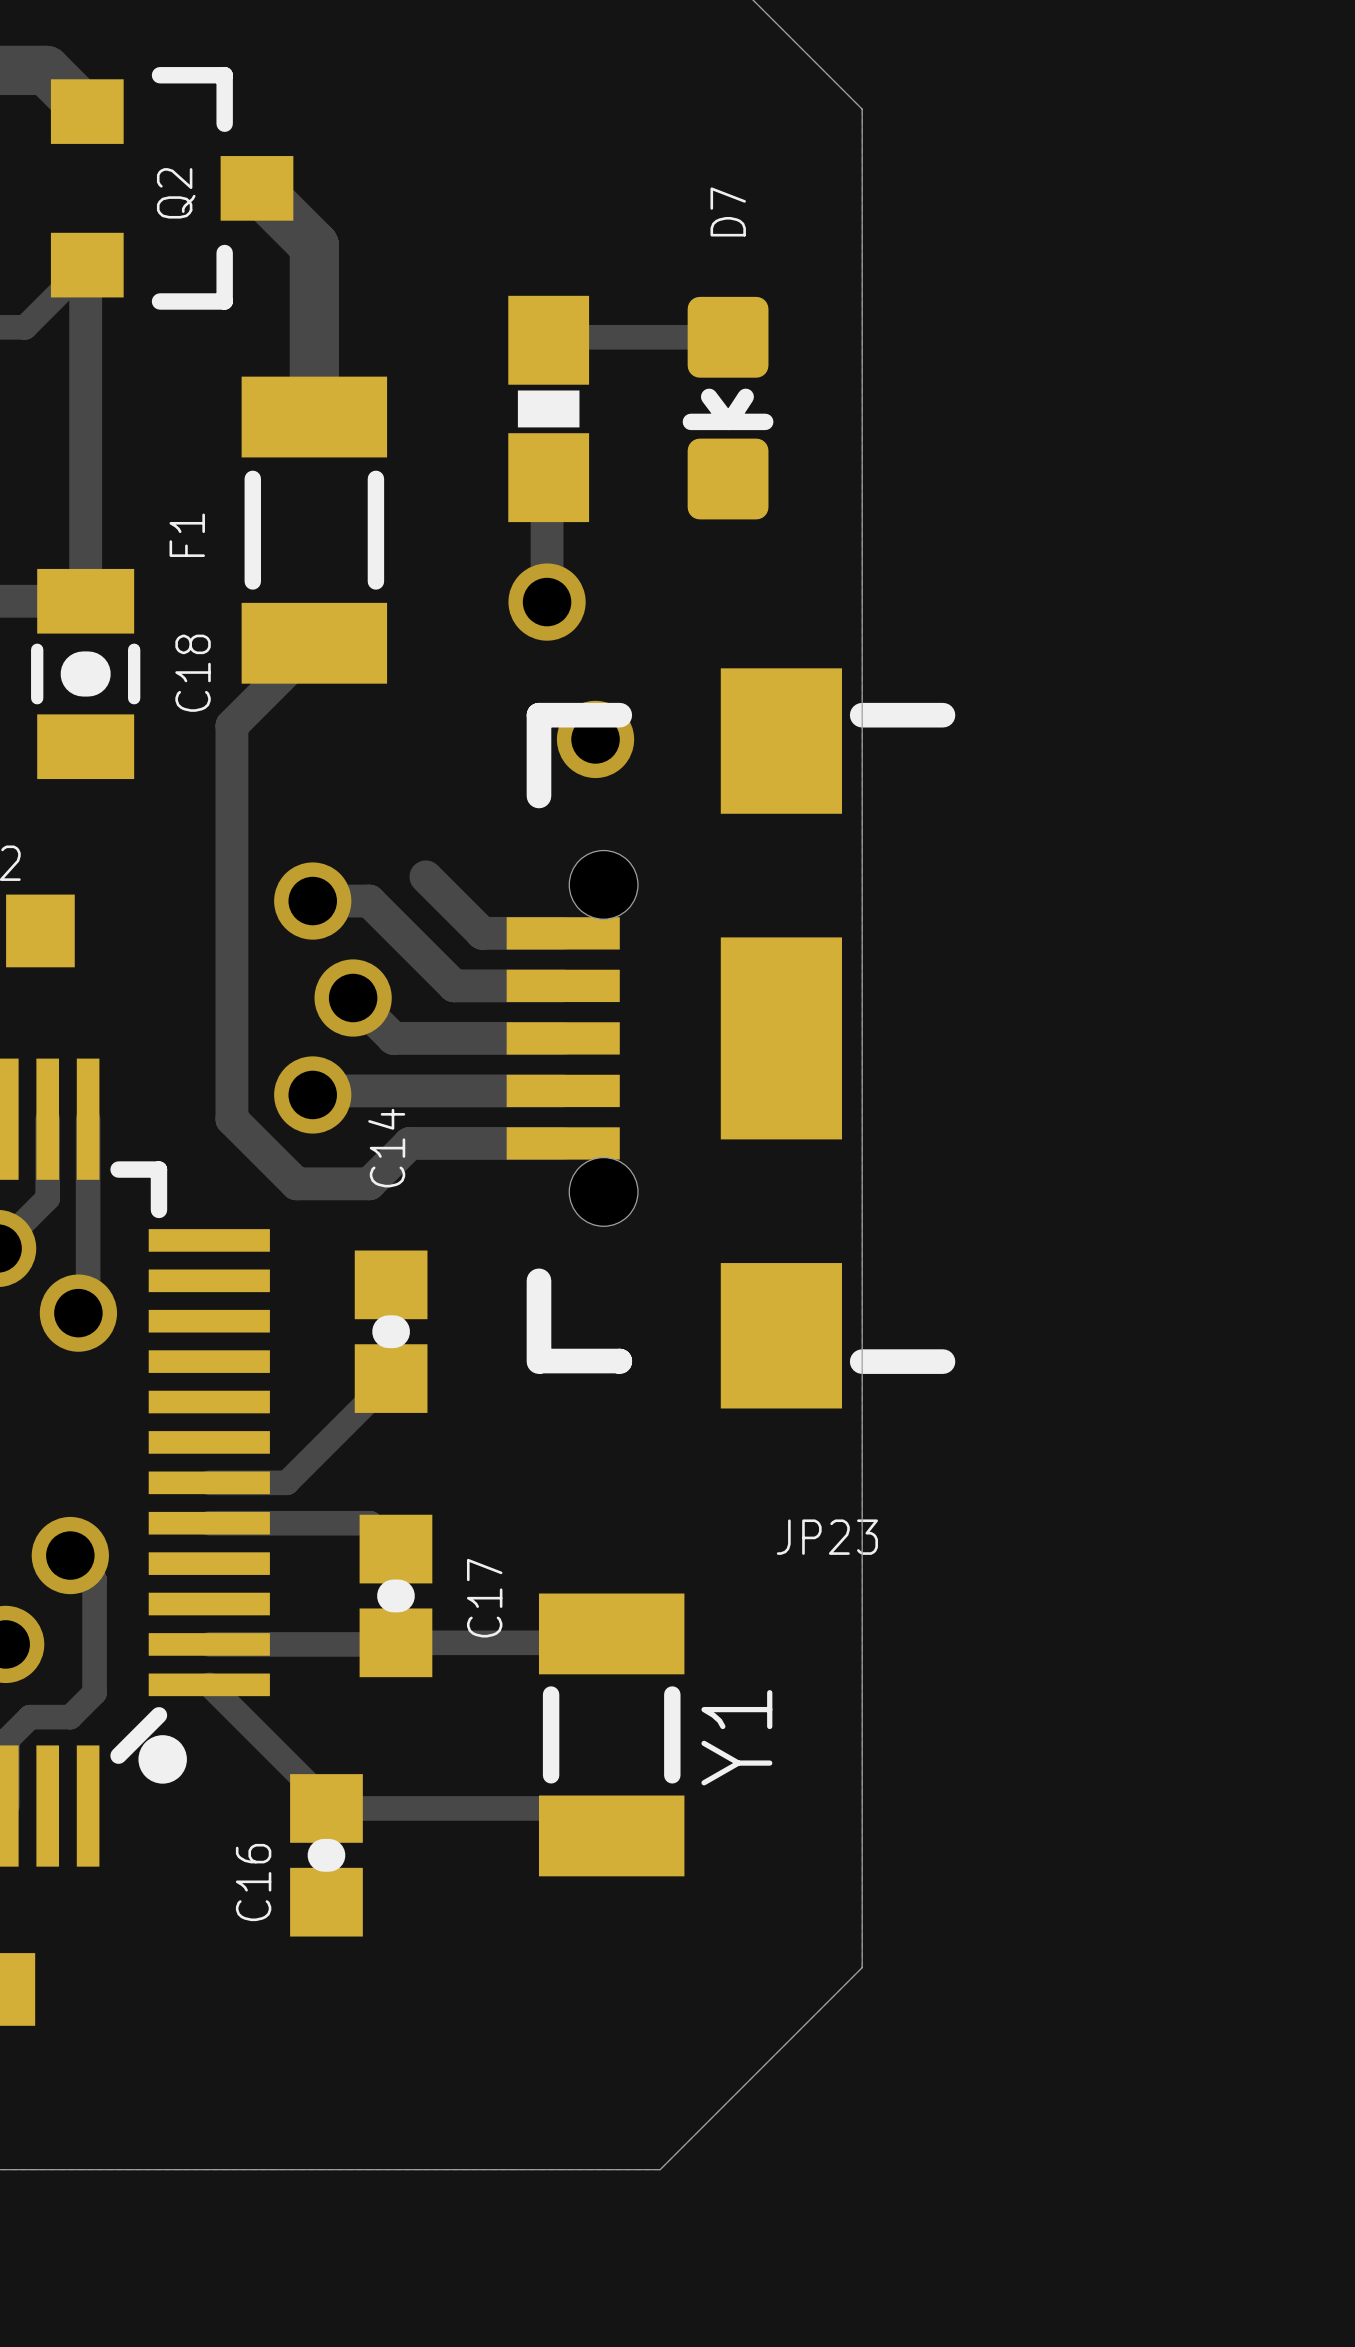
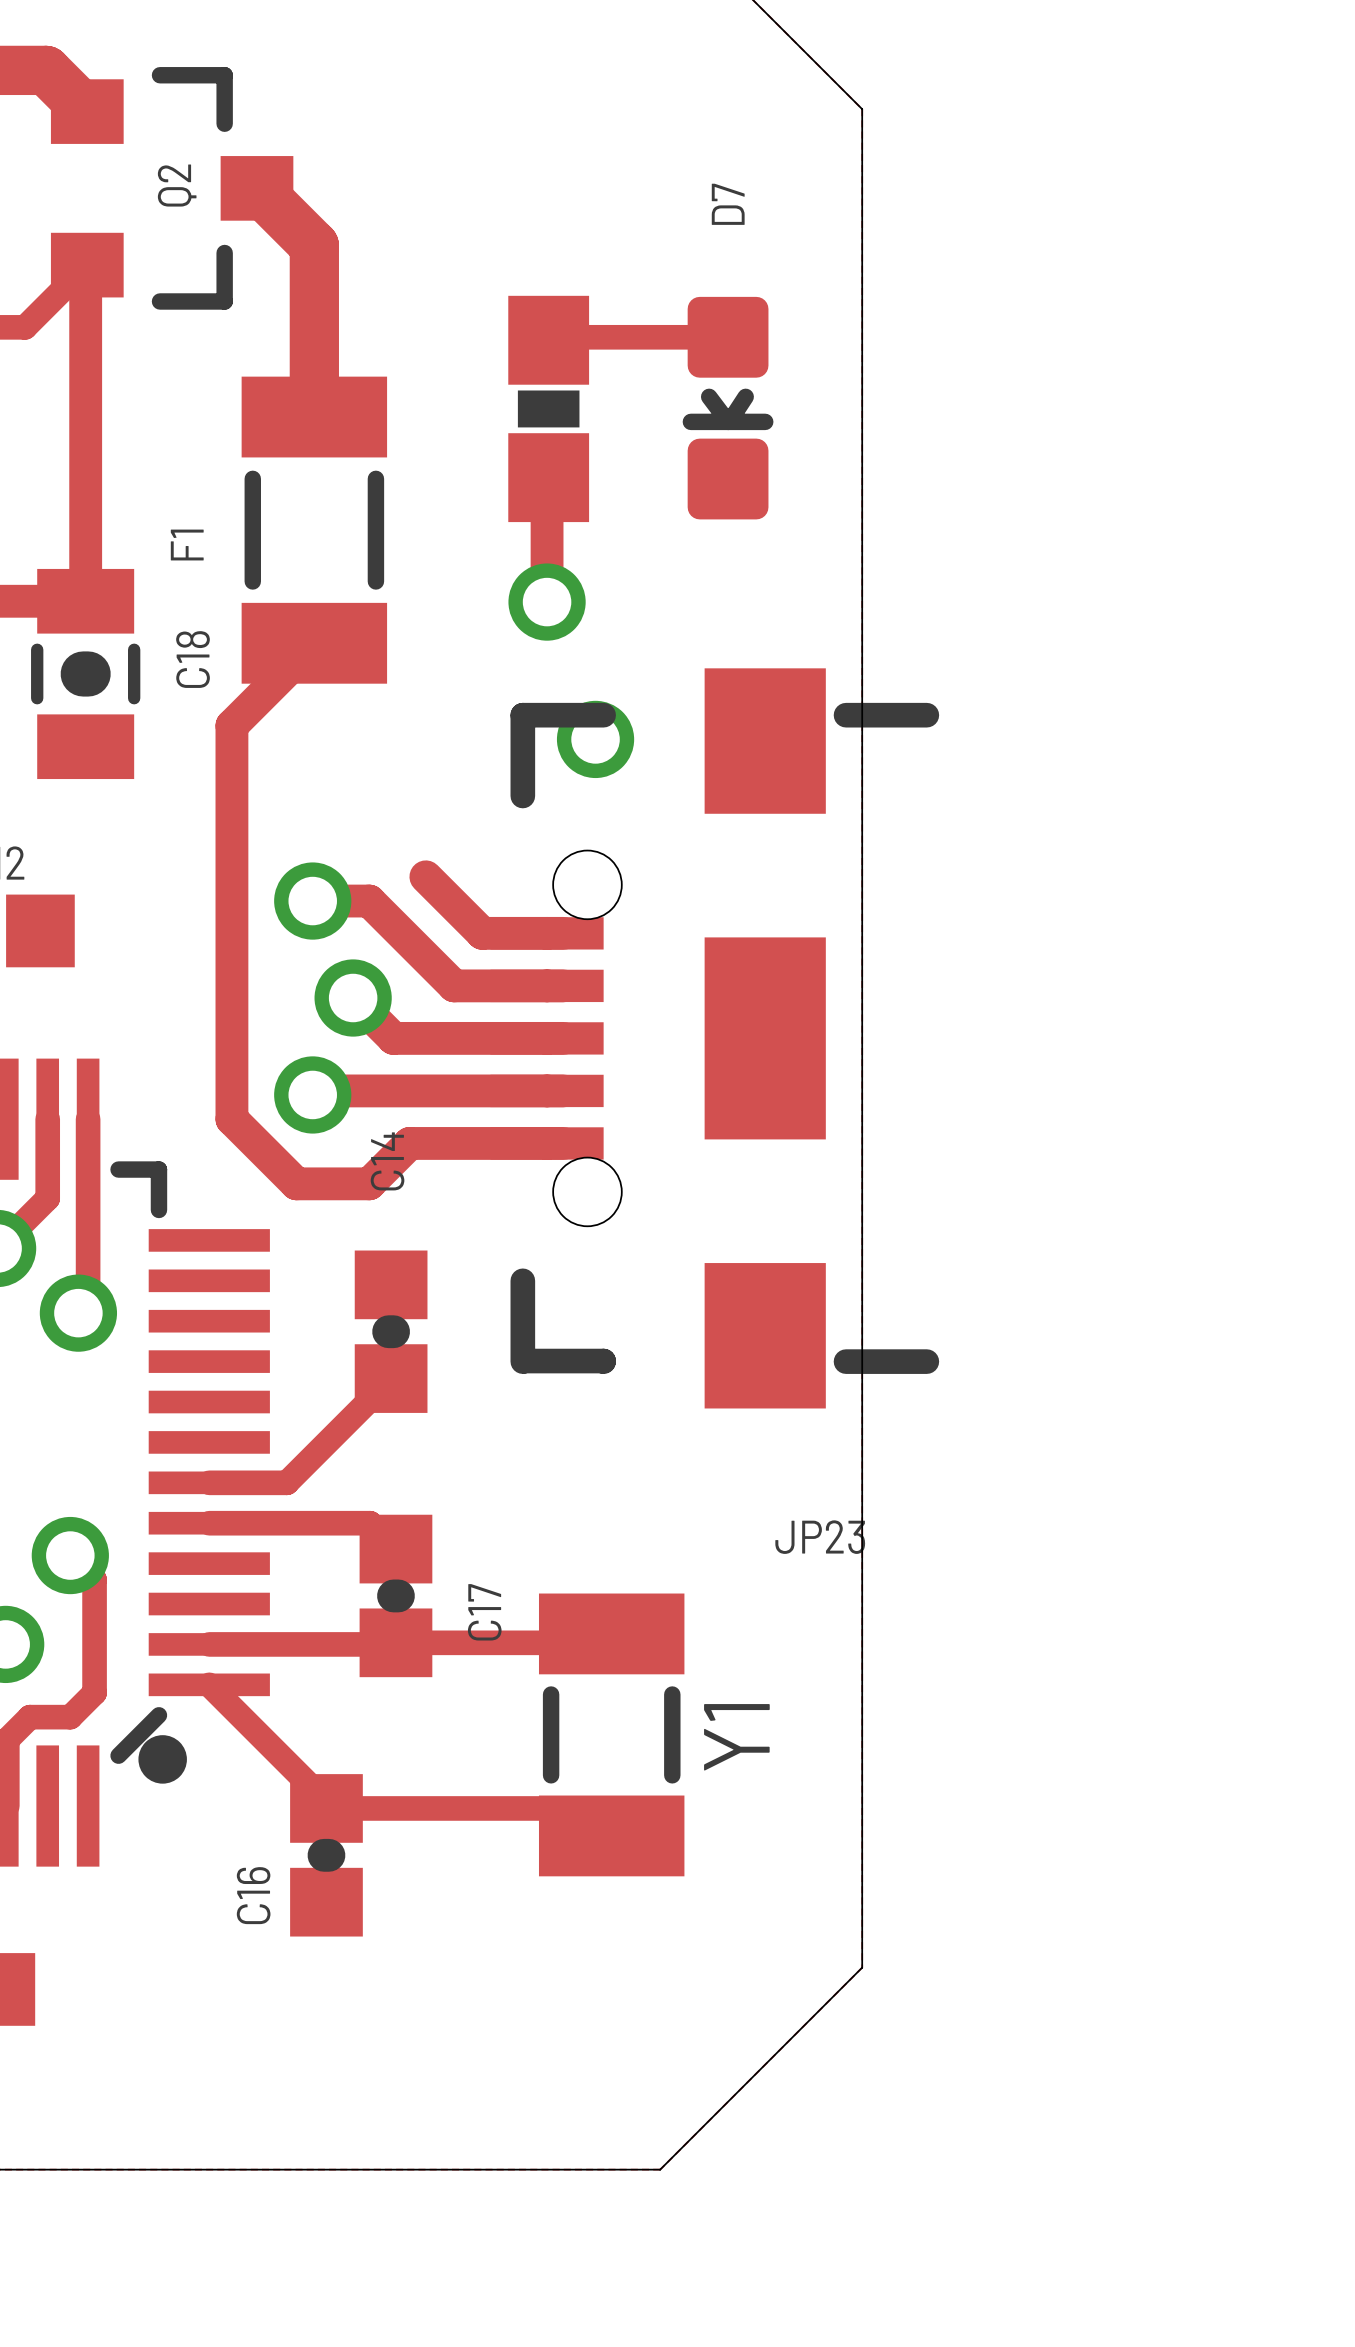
JP23 position: (730, 1038) -> (714, 1038)

